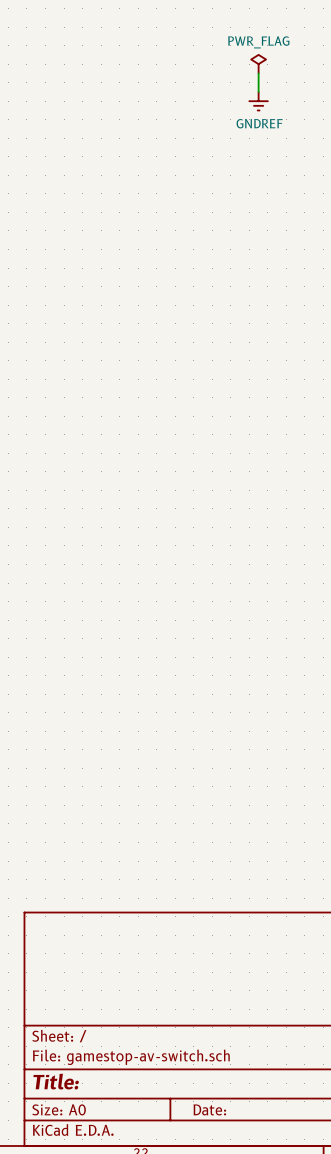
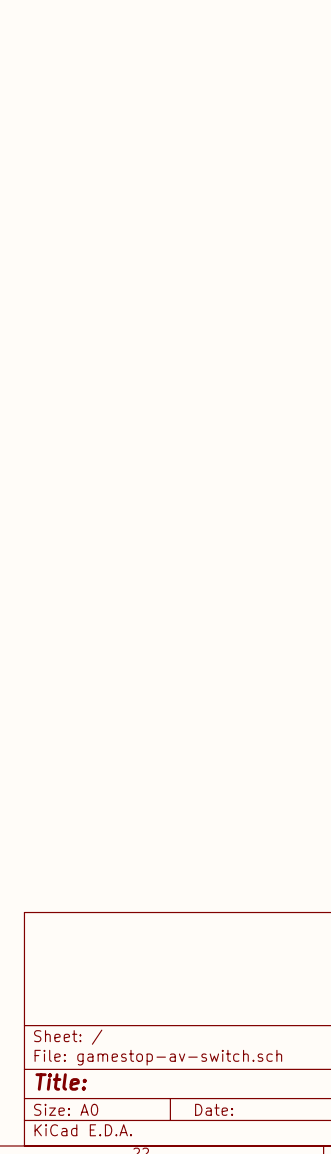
power symbol: PWR_FLAG (258, 64) -> none
wire: (258, 73) (258, 91) -> none
power symbol: GNDREF (258, 101) -> none

